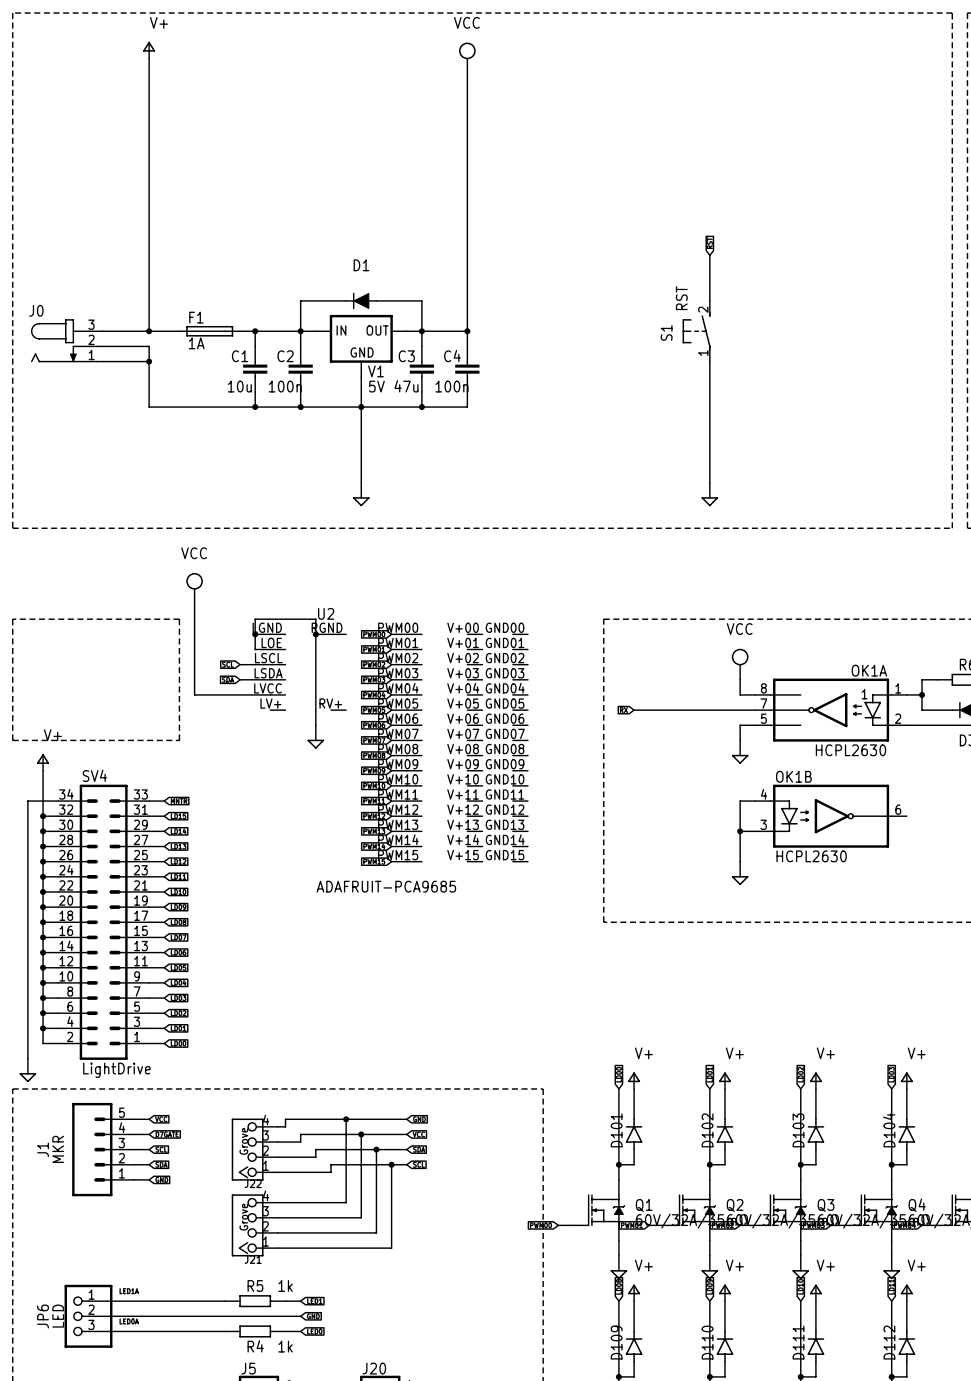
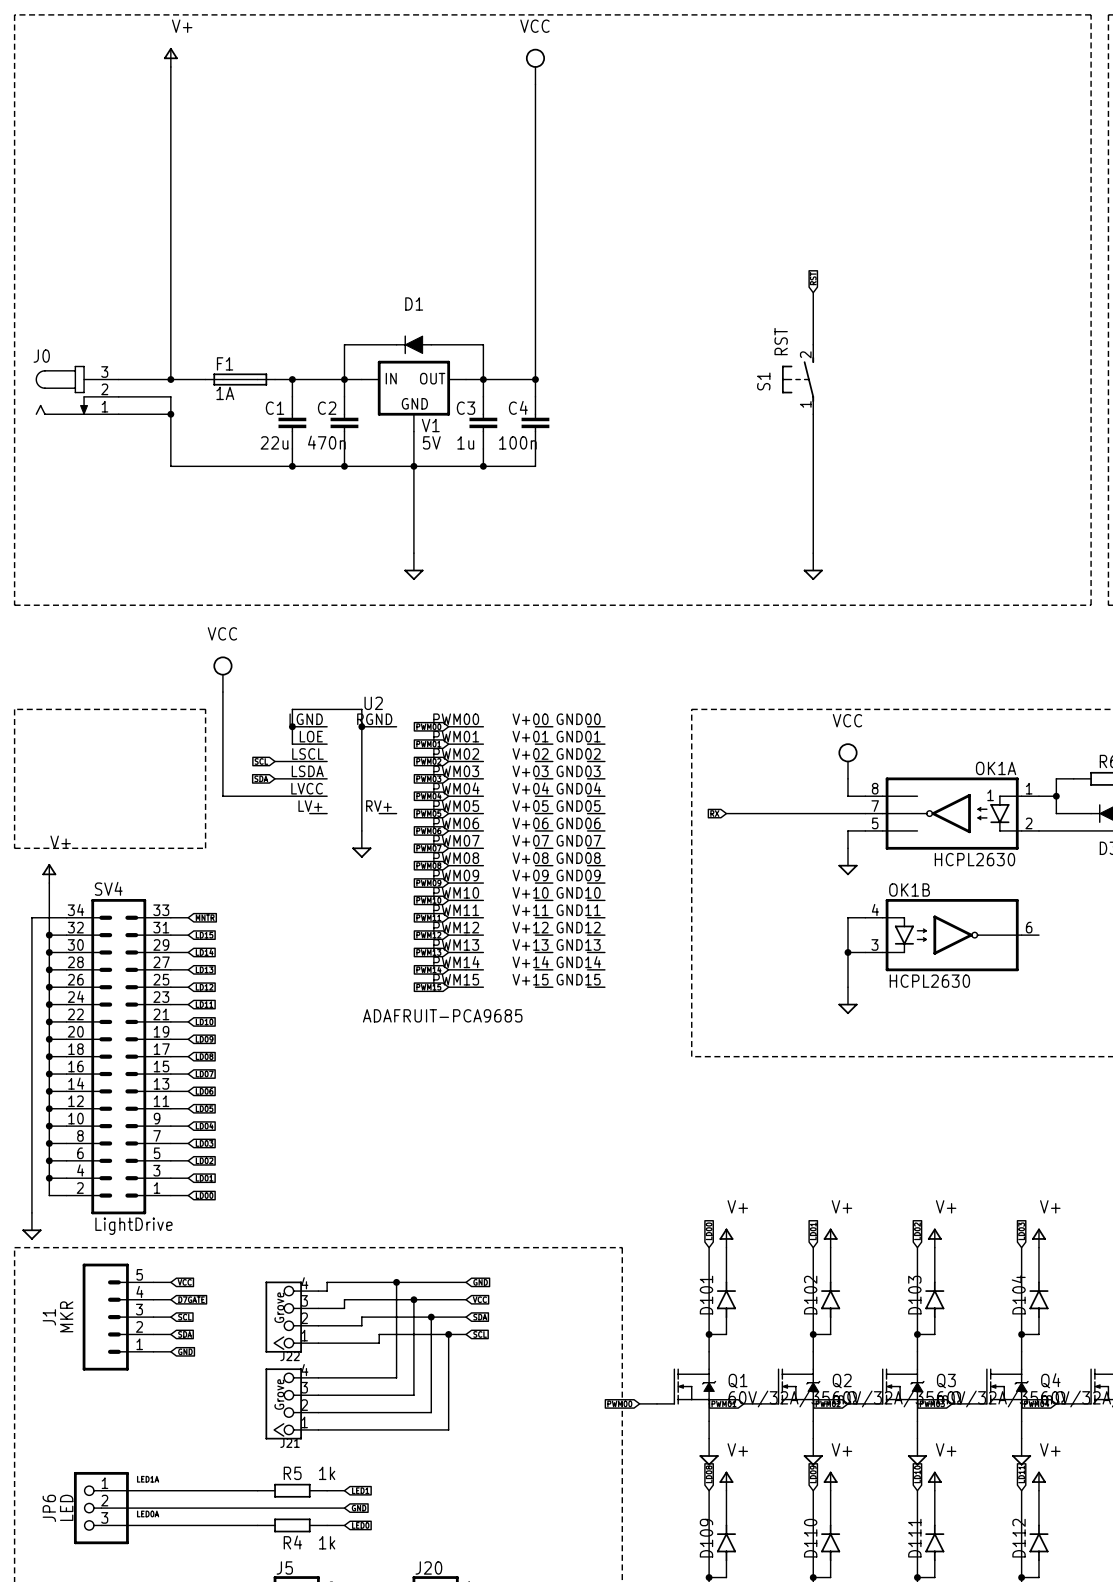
C1 value: 10u (239, 386) -> 22u (274, 442)
C2 value: 100n (285, 386) -> 470n (326, 442)
C3 value: 47u (406, 386) -> 1u (465, 442)

